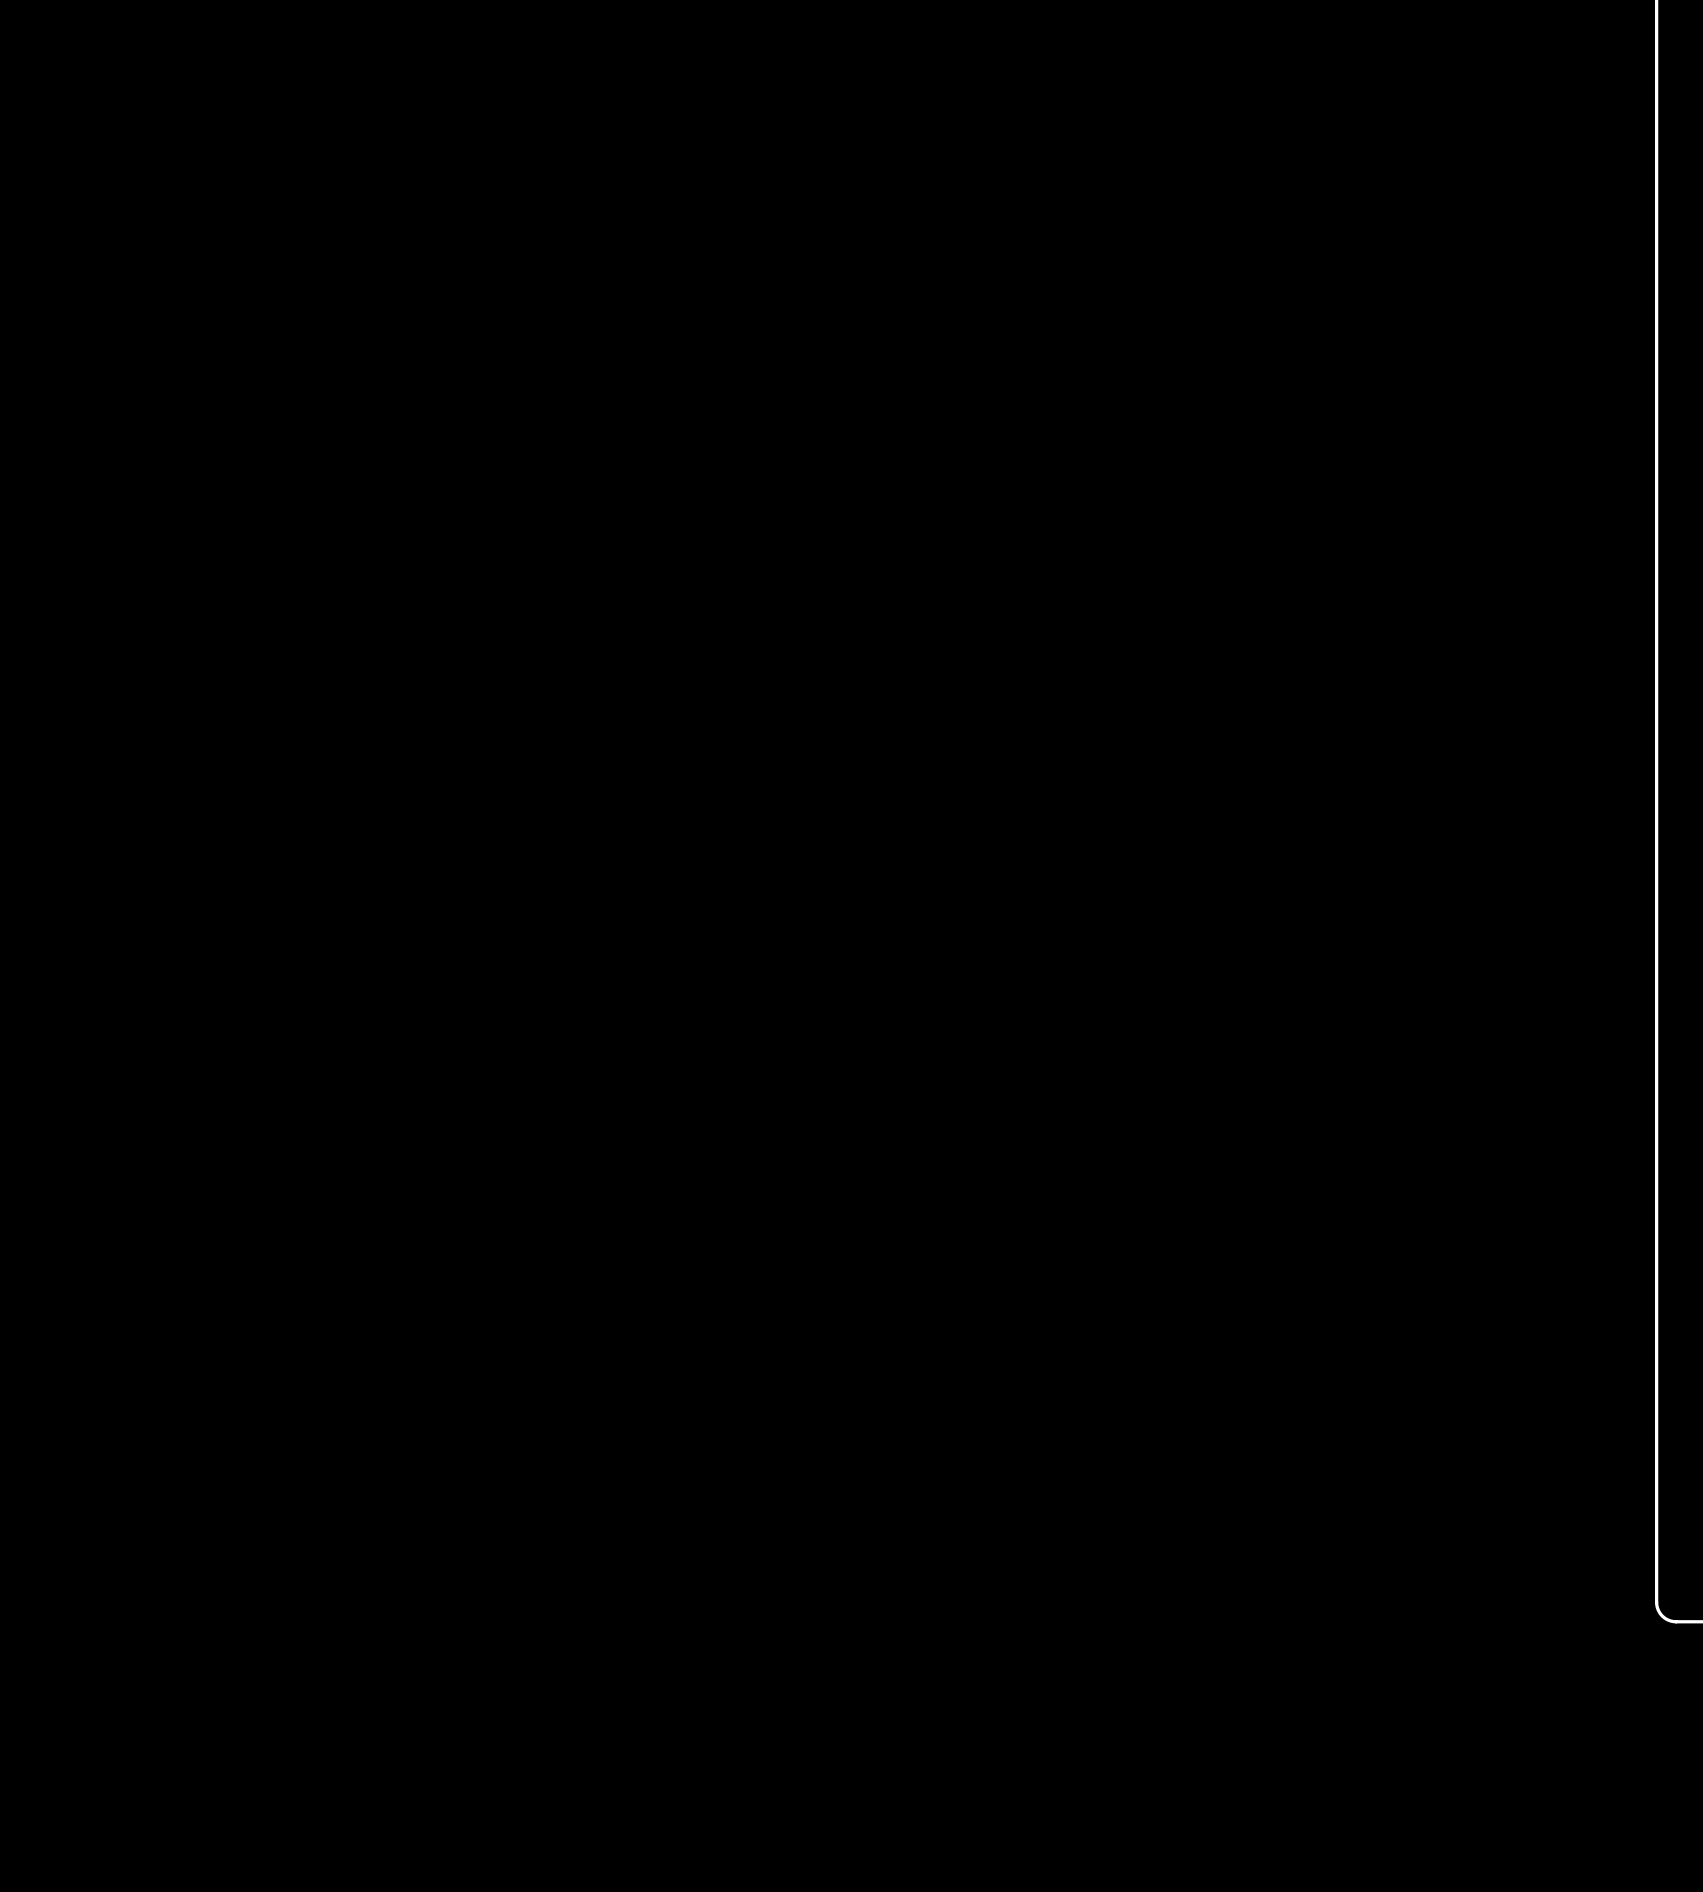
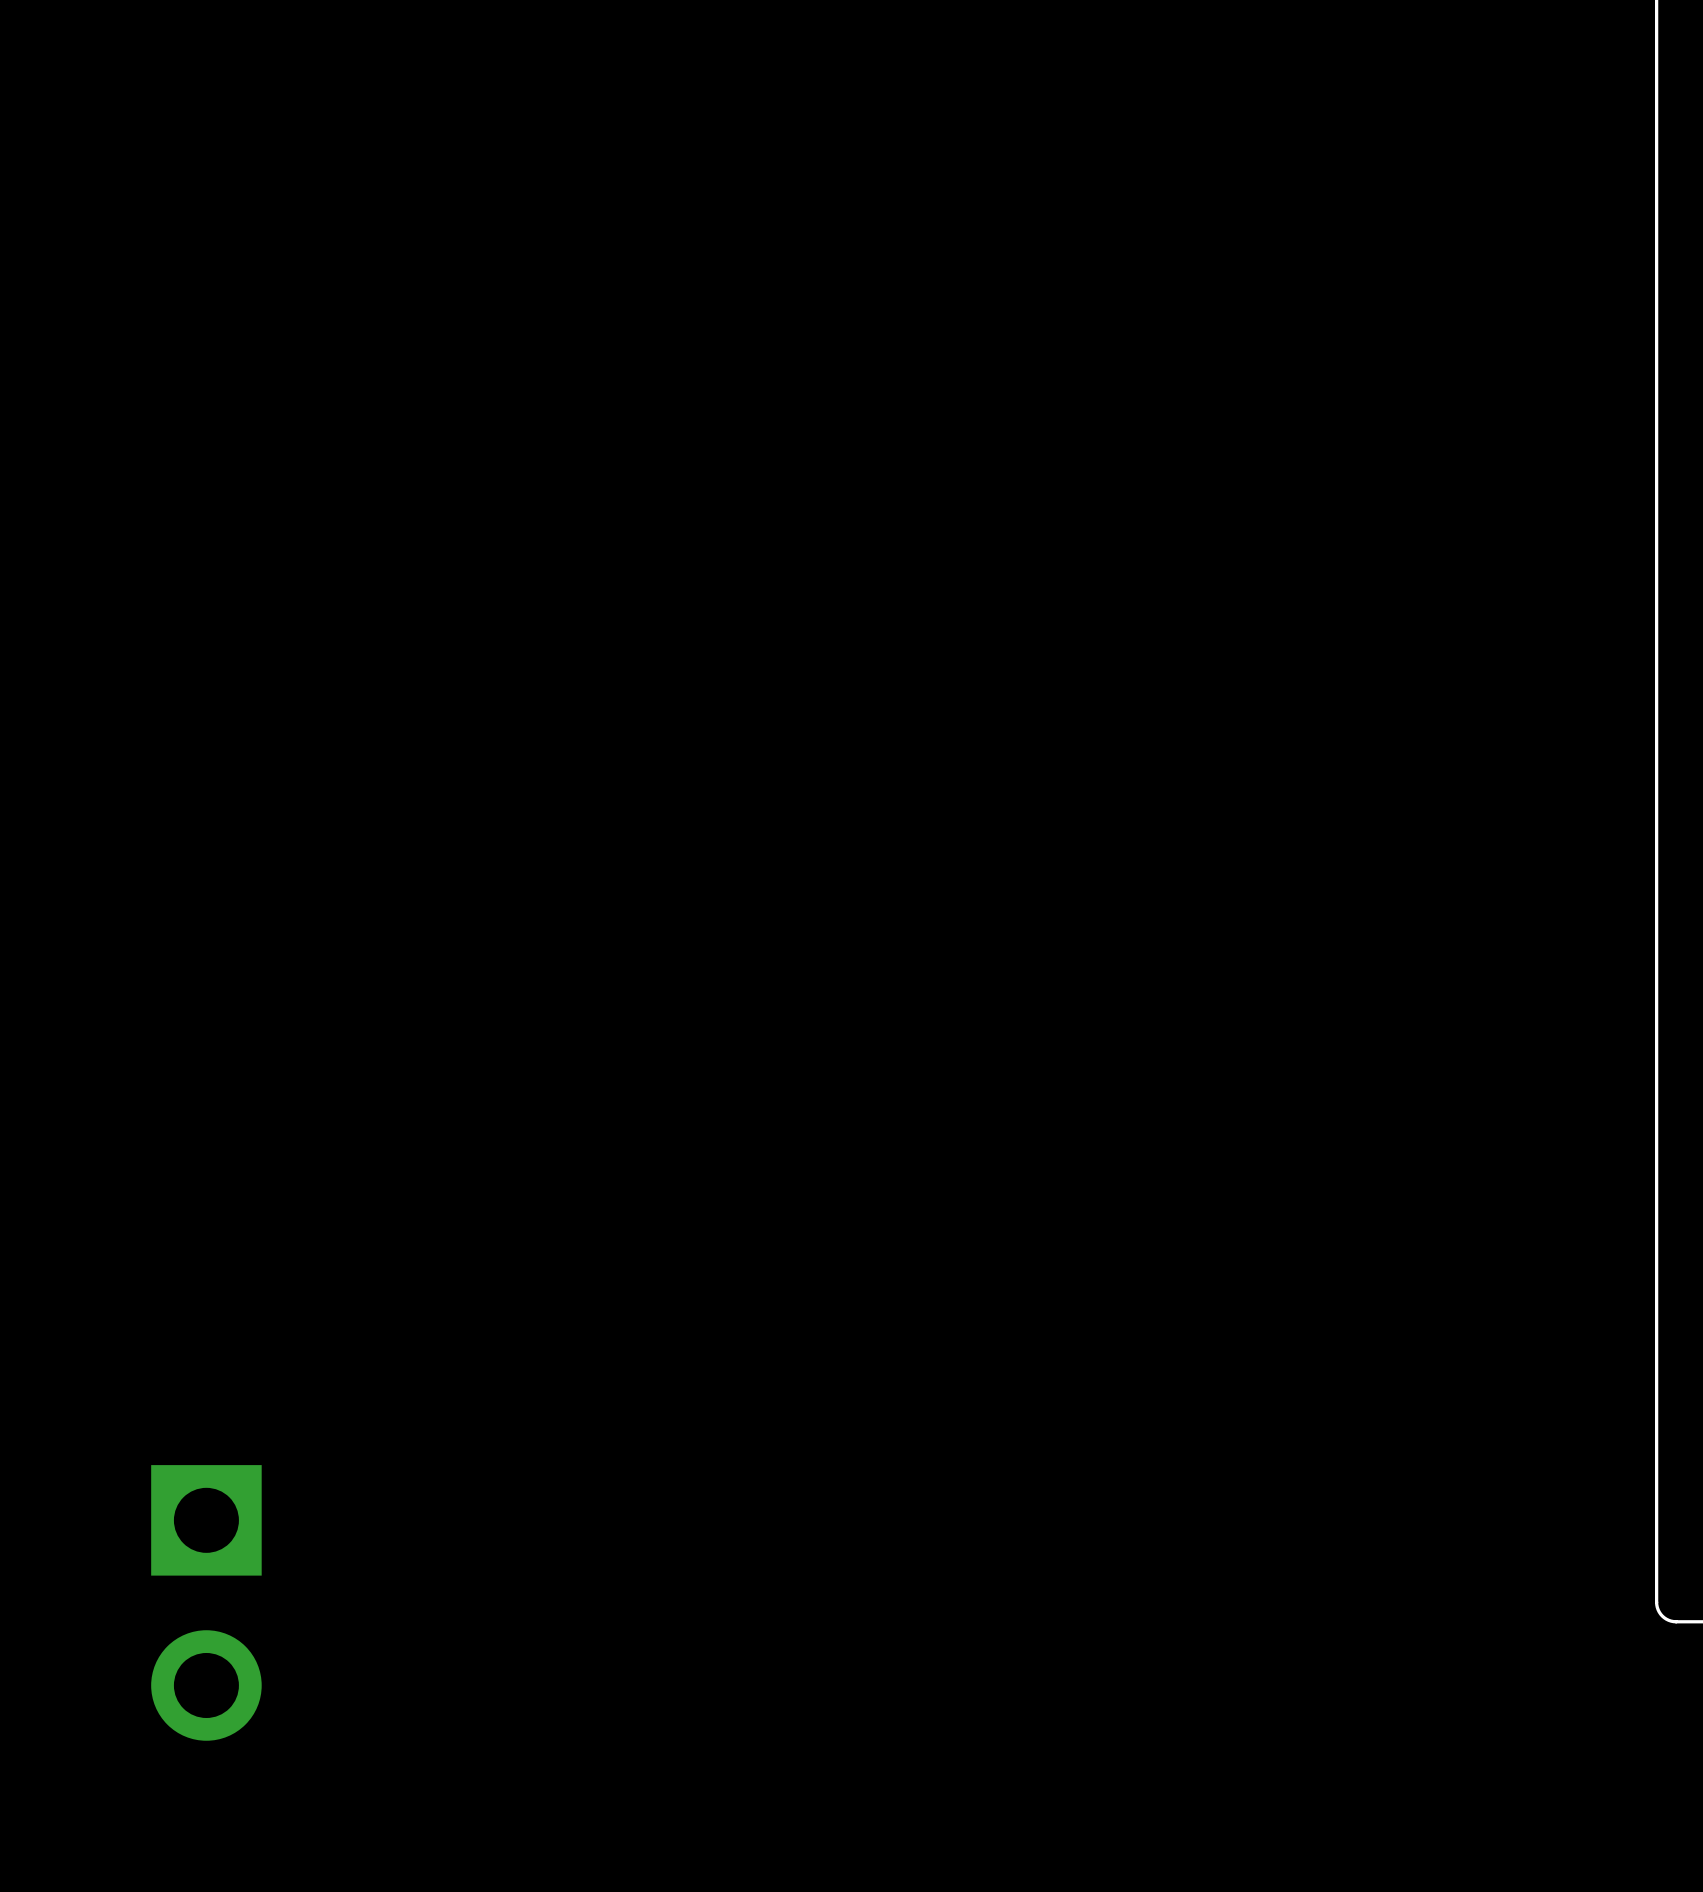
part: none -> (206, 1602)

